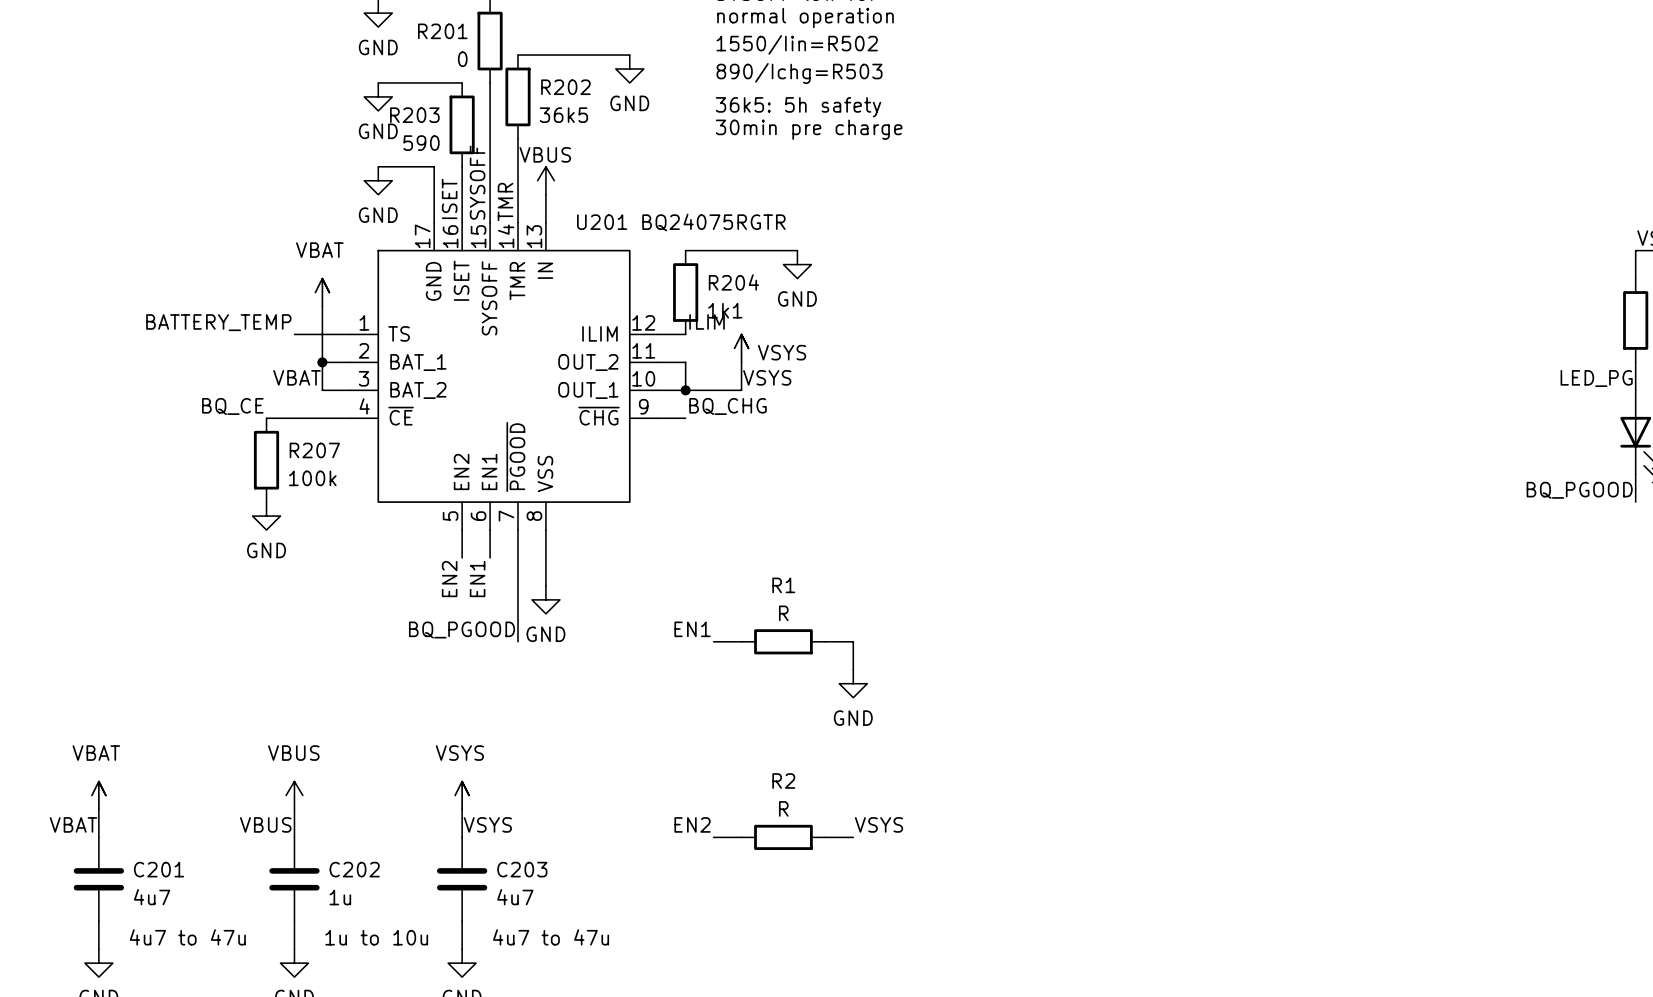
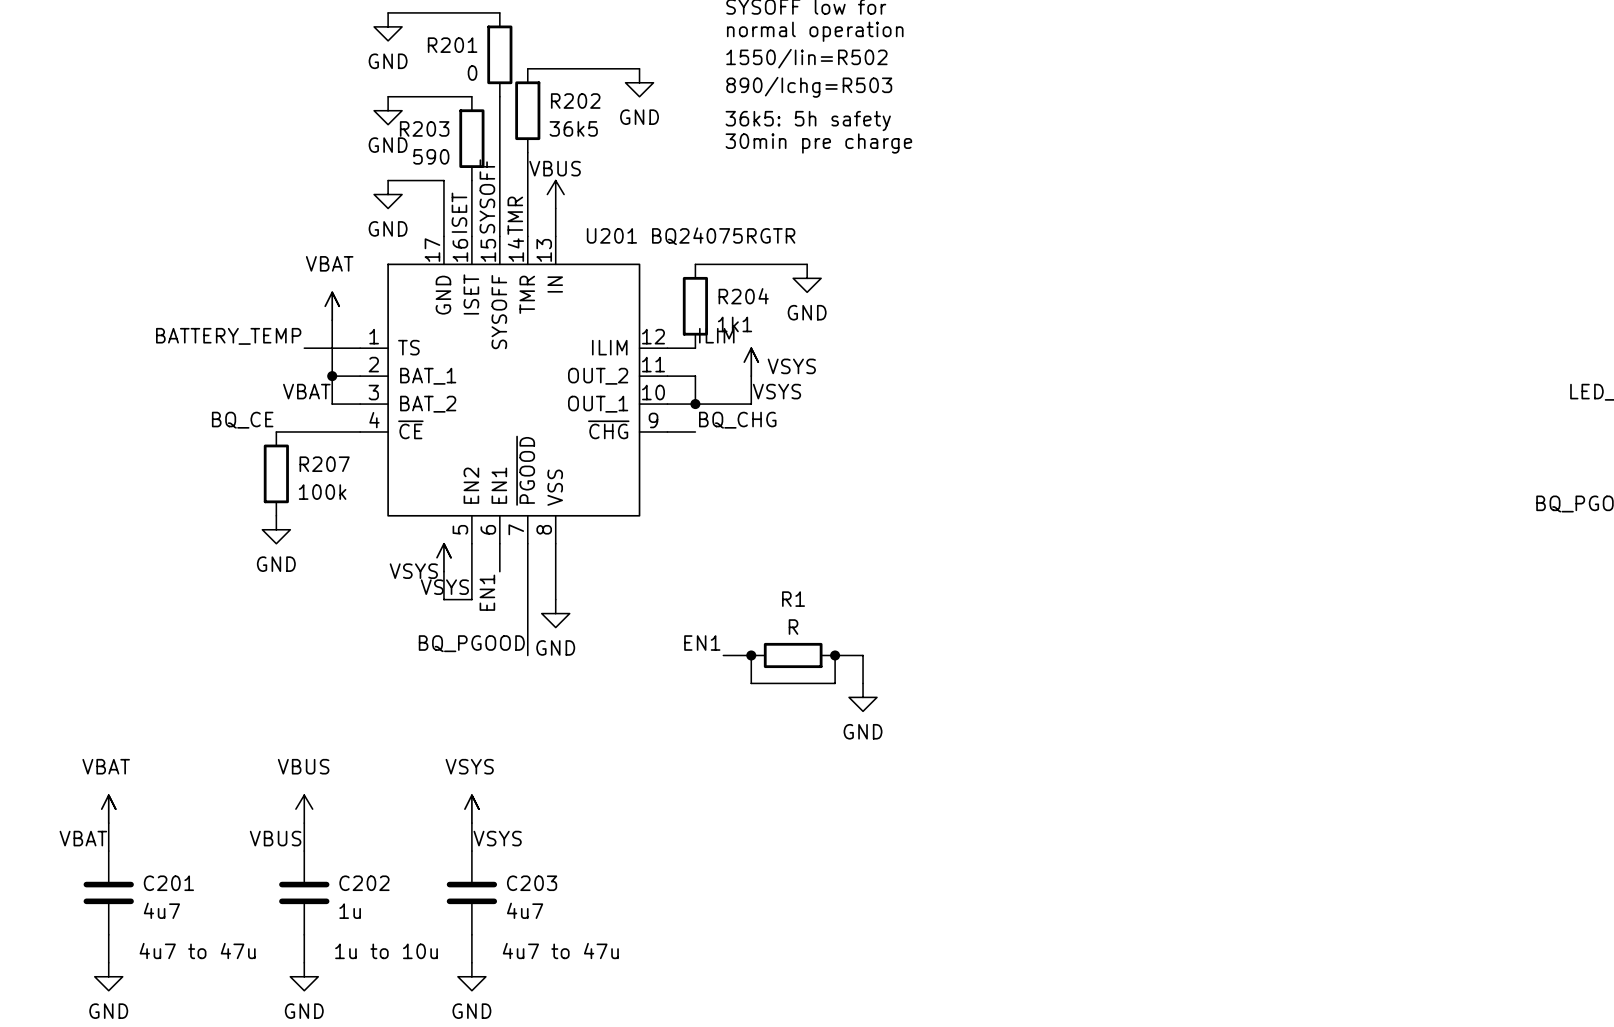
power symbol: none -> VSYS (443, 557)
wire: none -> (443, 571) (443, 599) (471, 599) (471, 571)
label: none -> VSYS (444, 587)
label: EN2 (449, 579) -> none
wire: none -> (751, 655) (751, 683) (835, 683) (835, 655)
junction: none -> (751, 655)
junction: none -> (835, 655)
label: EN2 (692, 824) -> none
label: VSYS (879, 824) -> none
wire: (713, 837) (741, 837) -> none
R2: R (783, 837) -> none
wire: (825, 837) (853, 837) -> none

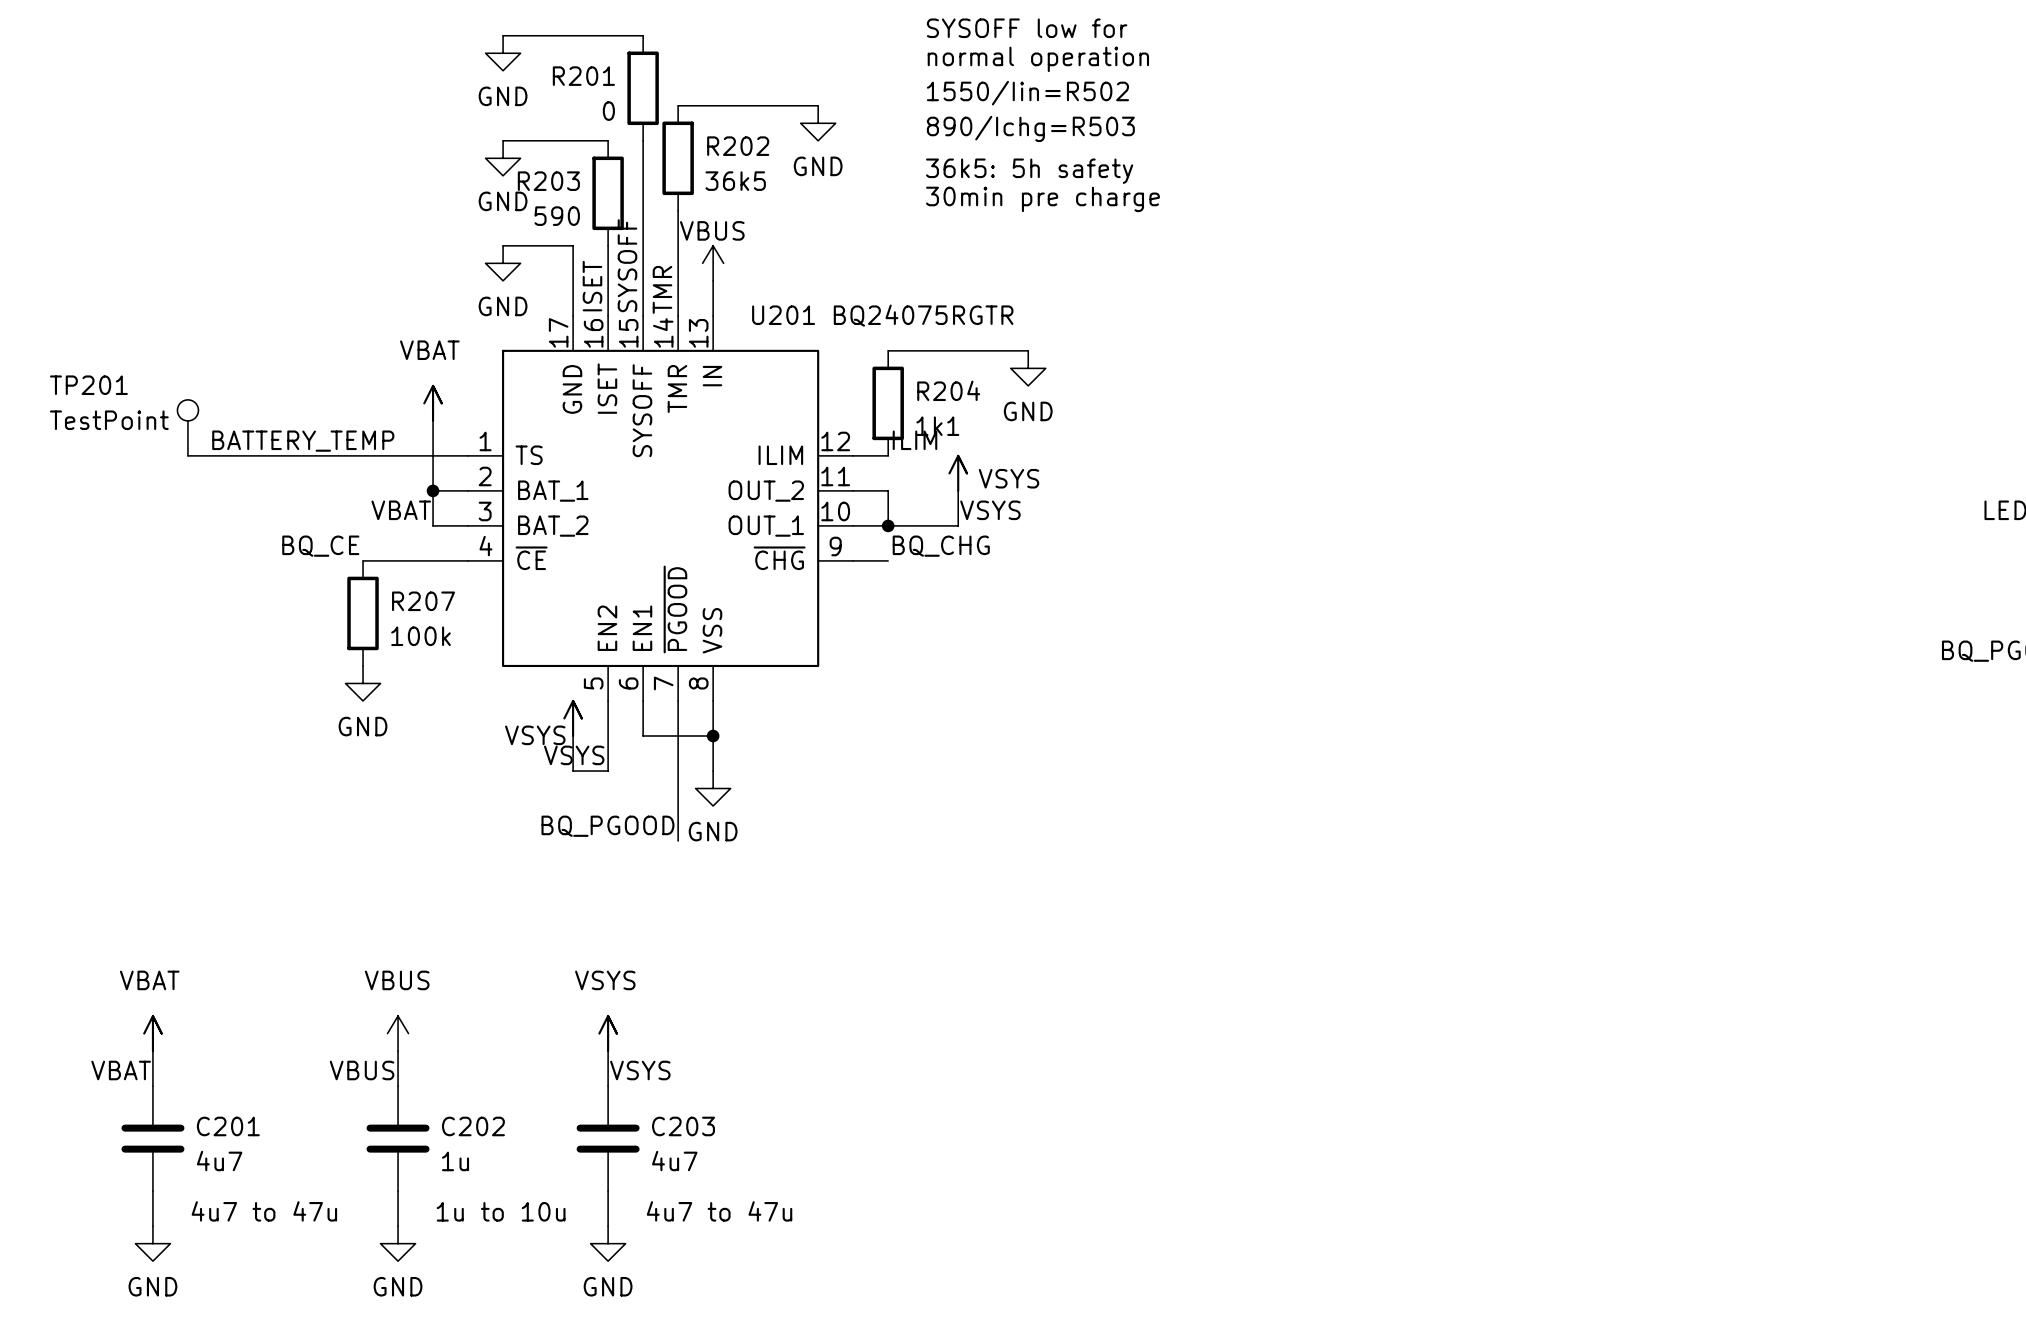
TP201: none -> TestPoint (187, 427)
wire: none -> (187, 455) (398, 455)
wire: none -> (643, 735) (713, 735)
junction: none -> (713, 735)
label: EN1 (487, 592) -> none
label: EN1 (702, 643) -> none
wire: (723, 655) (751, 655) (751, 683) (835, 683) (835, 655) (863, 655) (863, 683) -> none
junction: (751, 655) -> none
R1: R (793, 655) -> none
junction: (835, 655) -> none
power symbol: GND (863, 697) -> none

